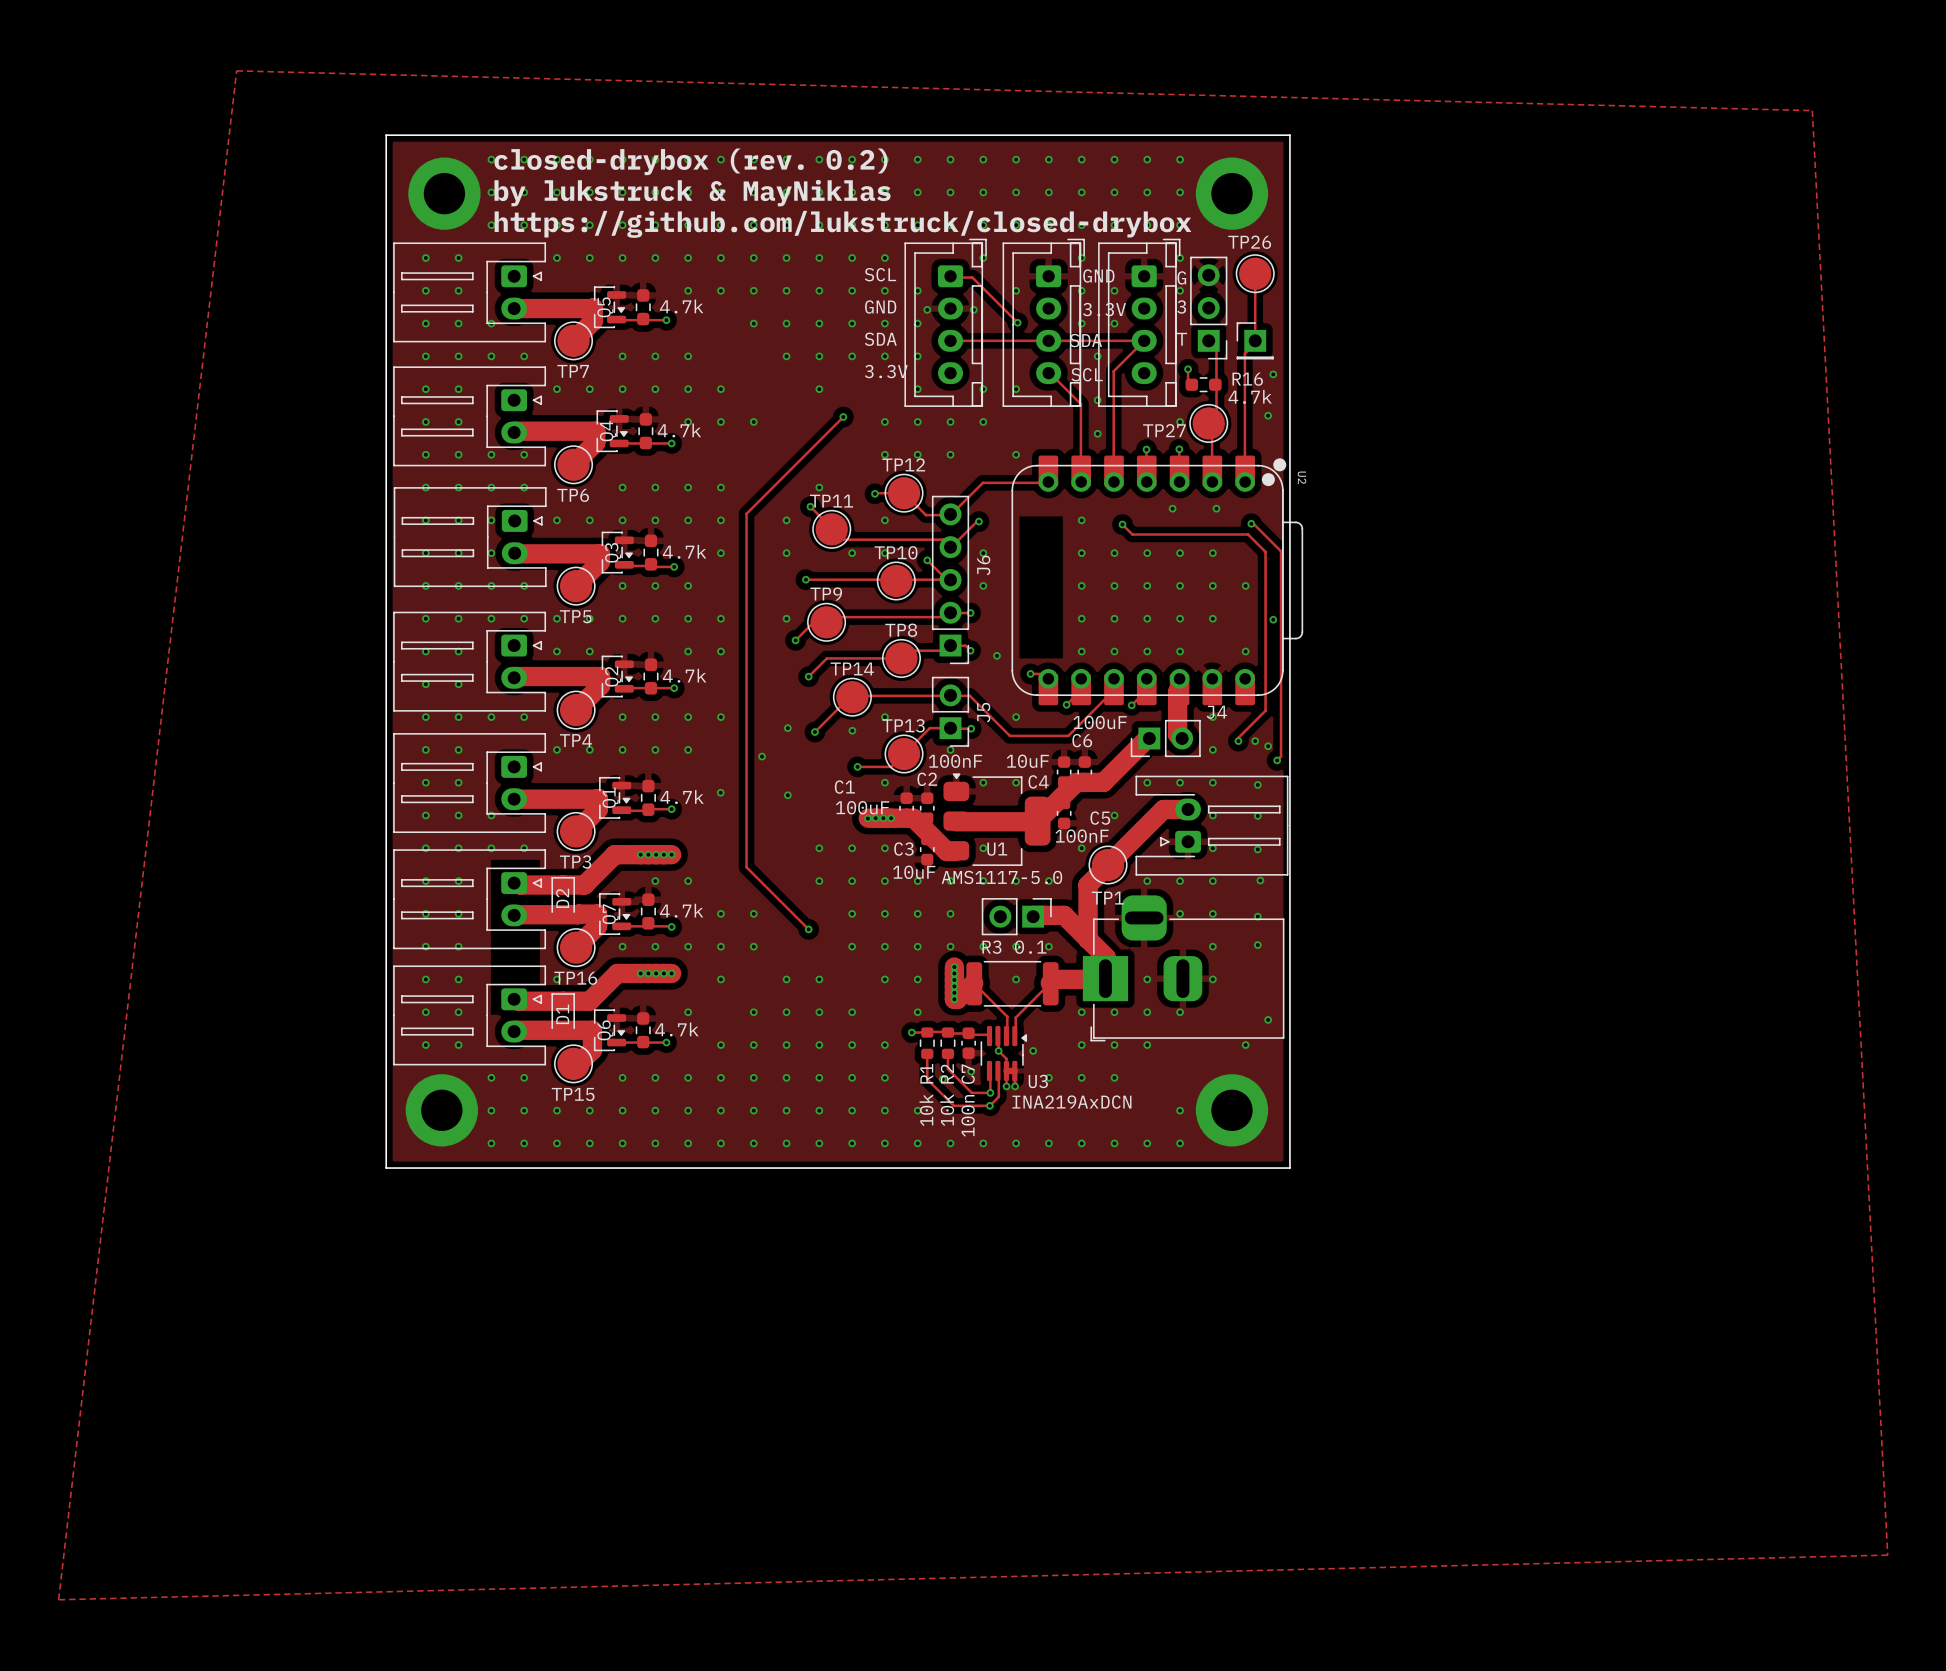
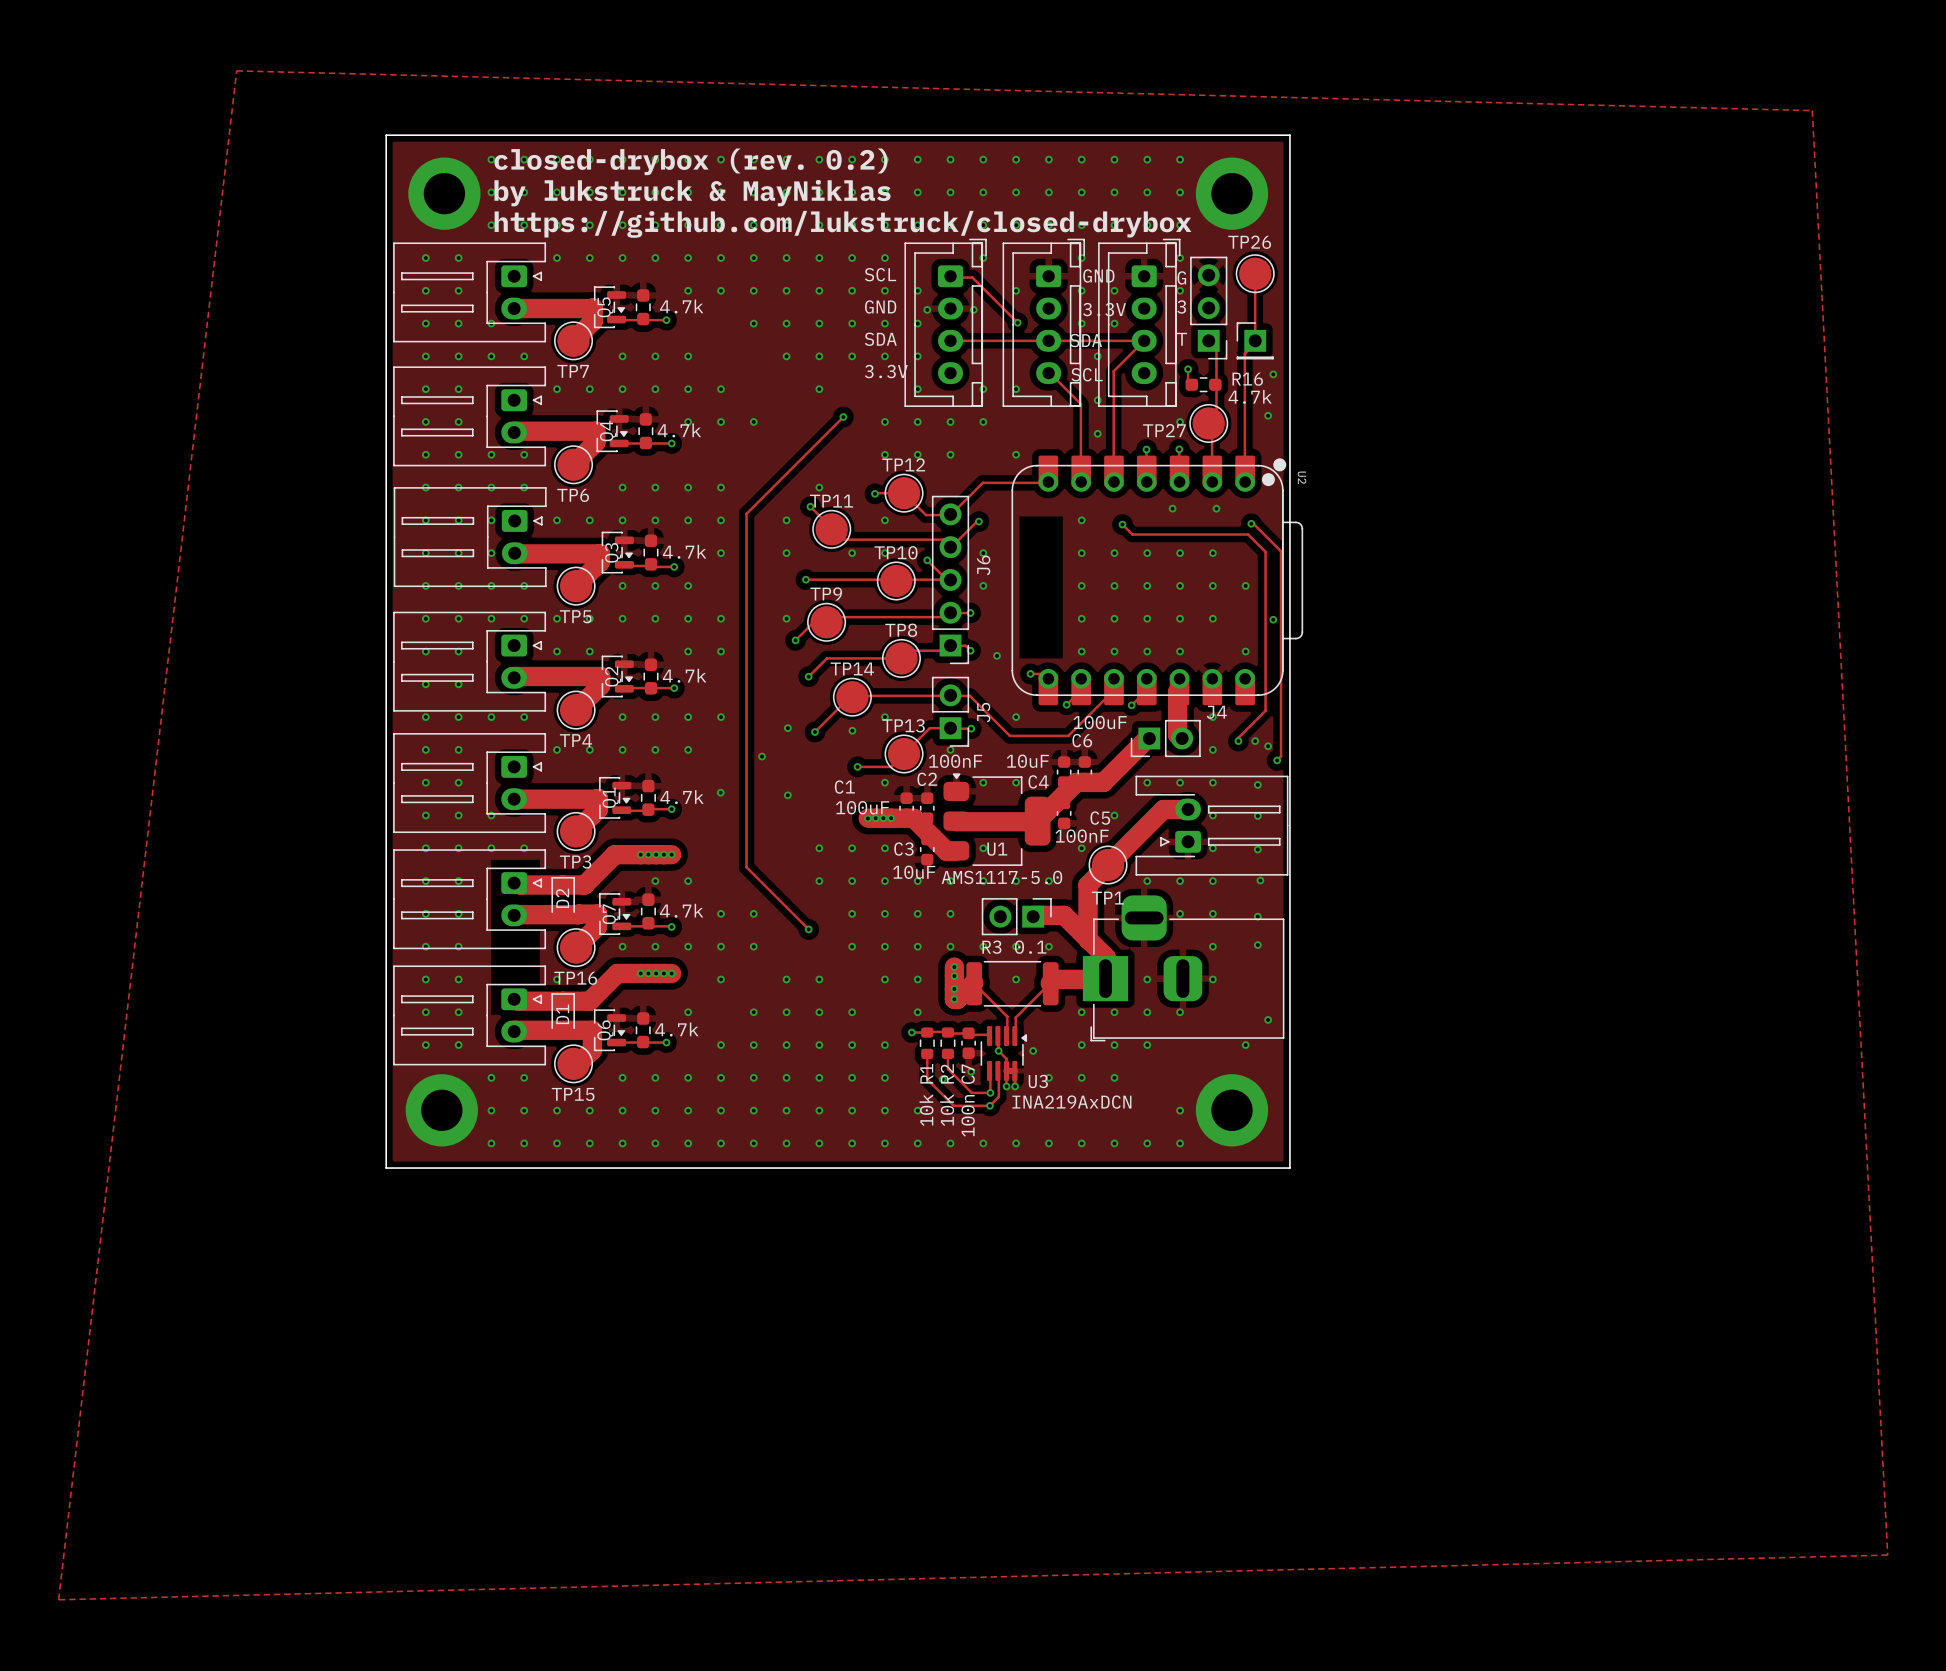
via: (954, 973) -> none
via: none -> (954, 976)
via: (954, 979) -> none
via: (954, 986) -> none
via: none -> (954, 988)
via: (954, 992) -> none

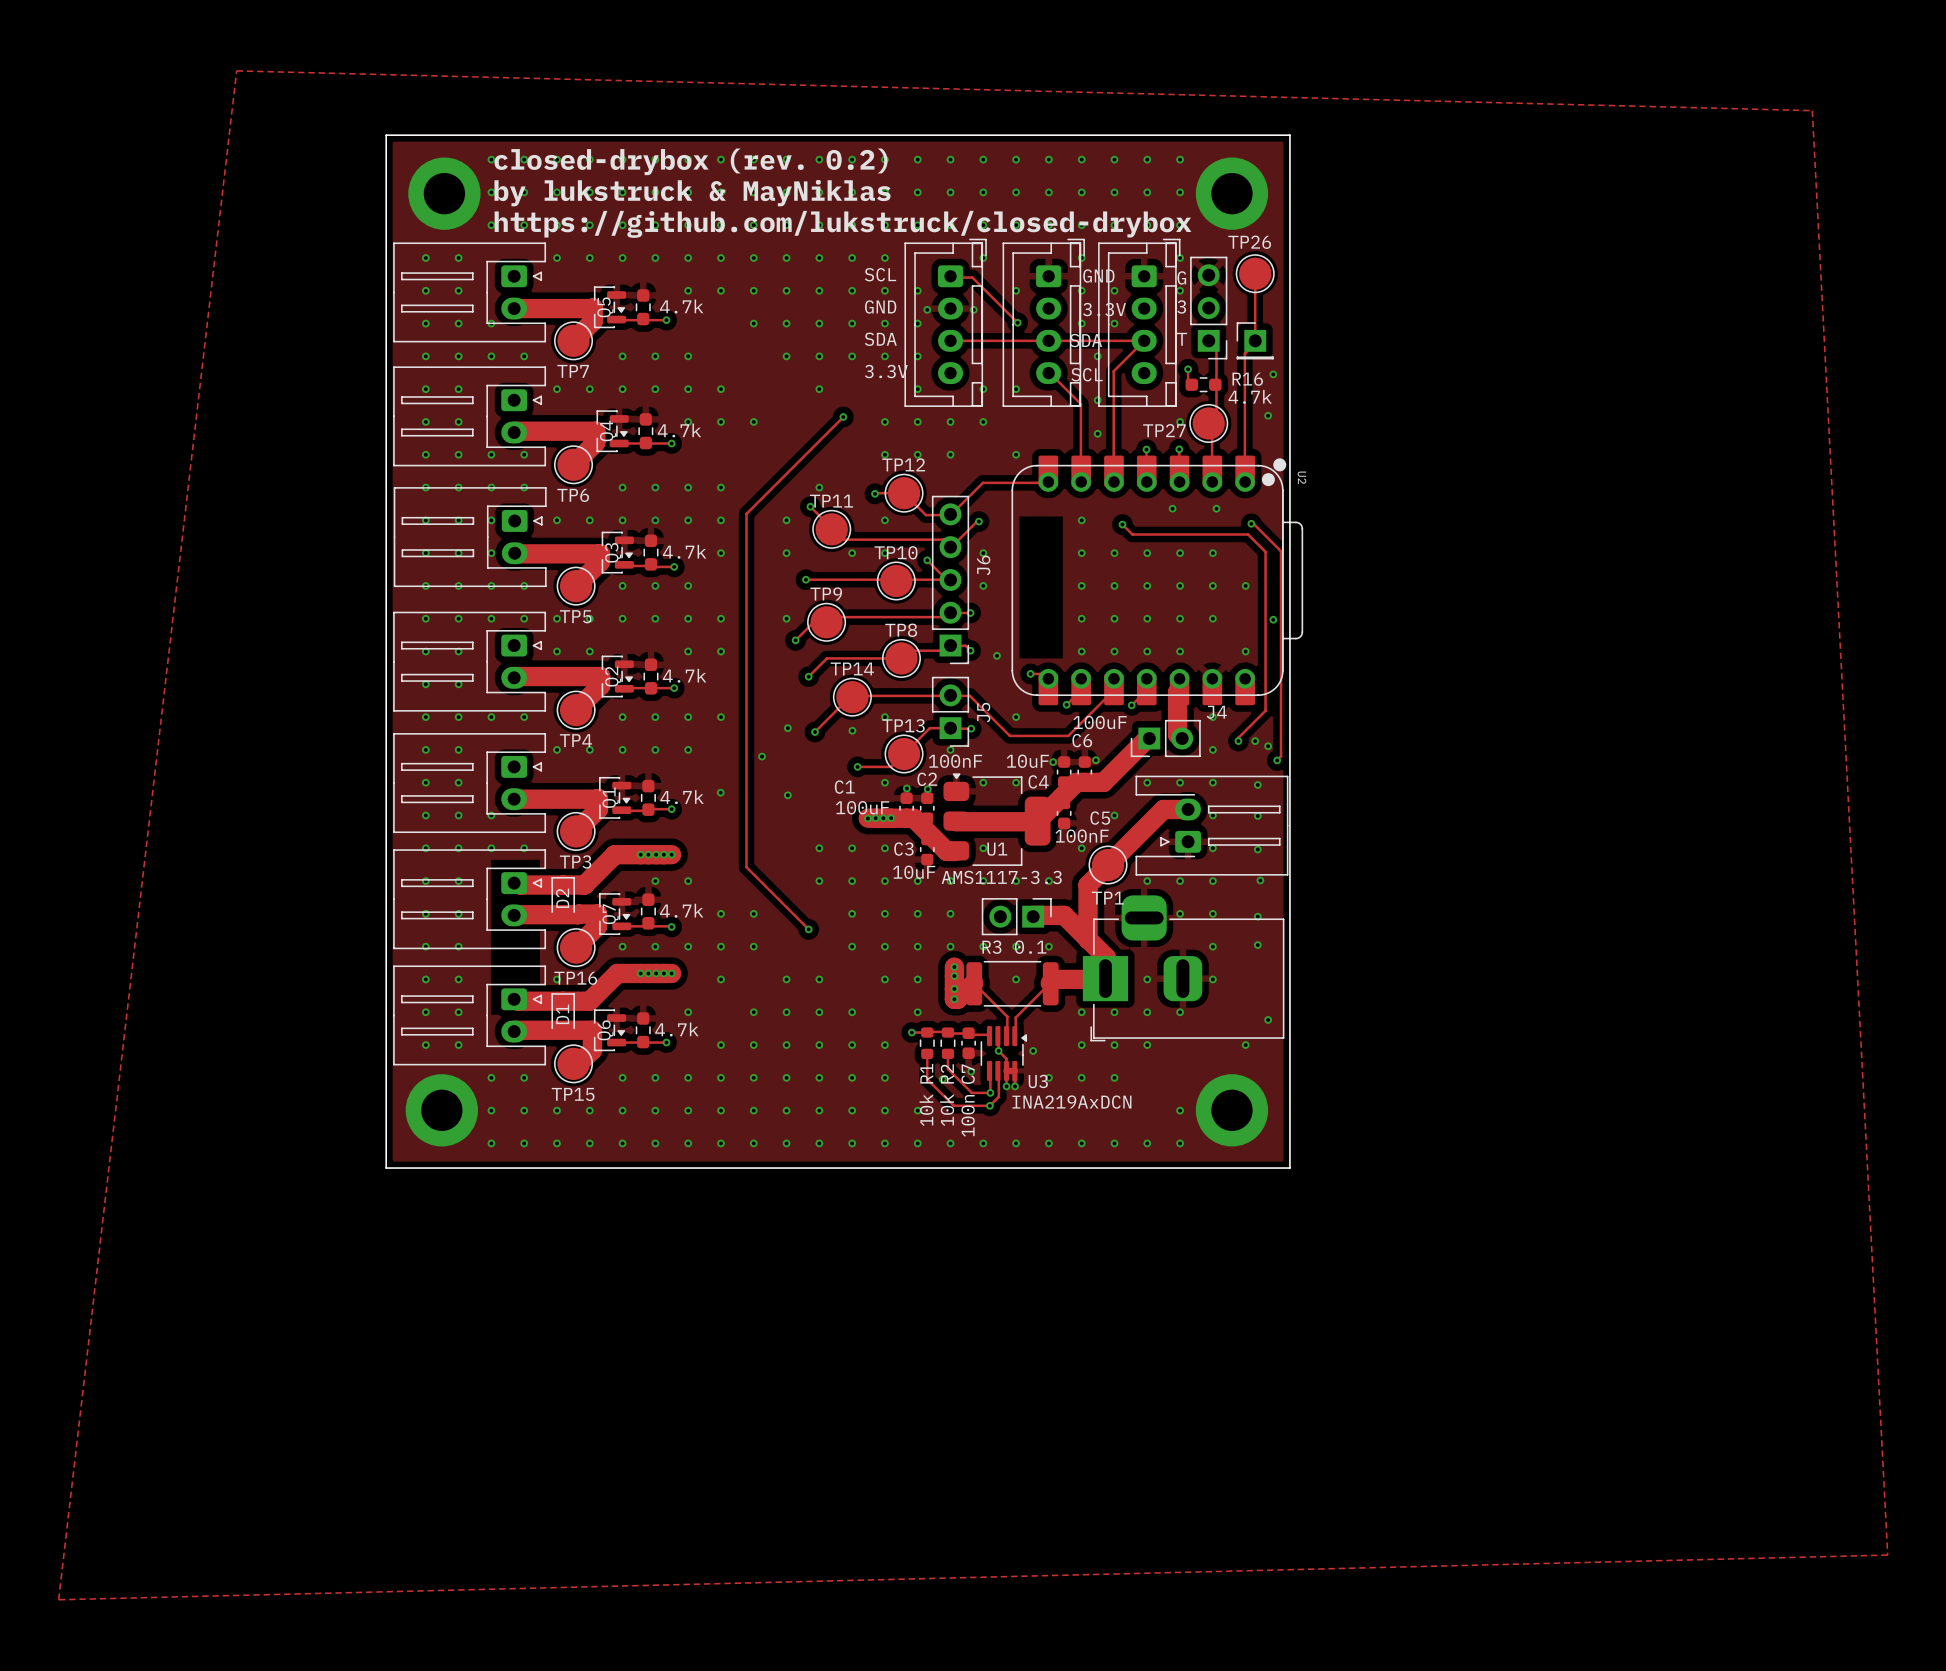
via: none -> (1095, 760)
via: none -> (1053, 762)
via: none -> (906, 788)
via: none -> (927, 789)
U1 value: AMS1117-5.0 (1001, 877) -> AMS1117-3.3 (1001, 877)

